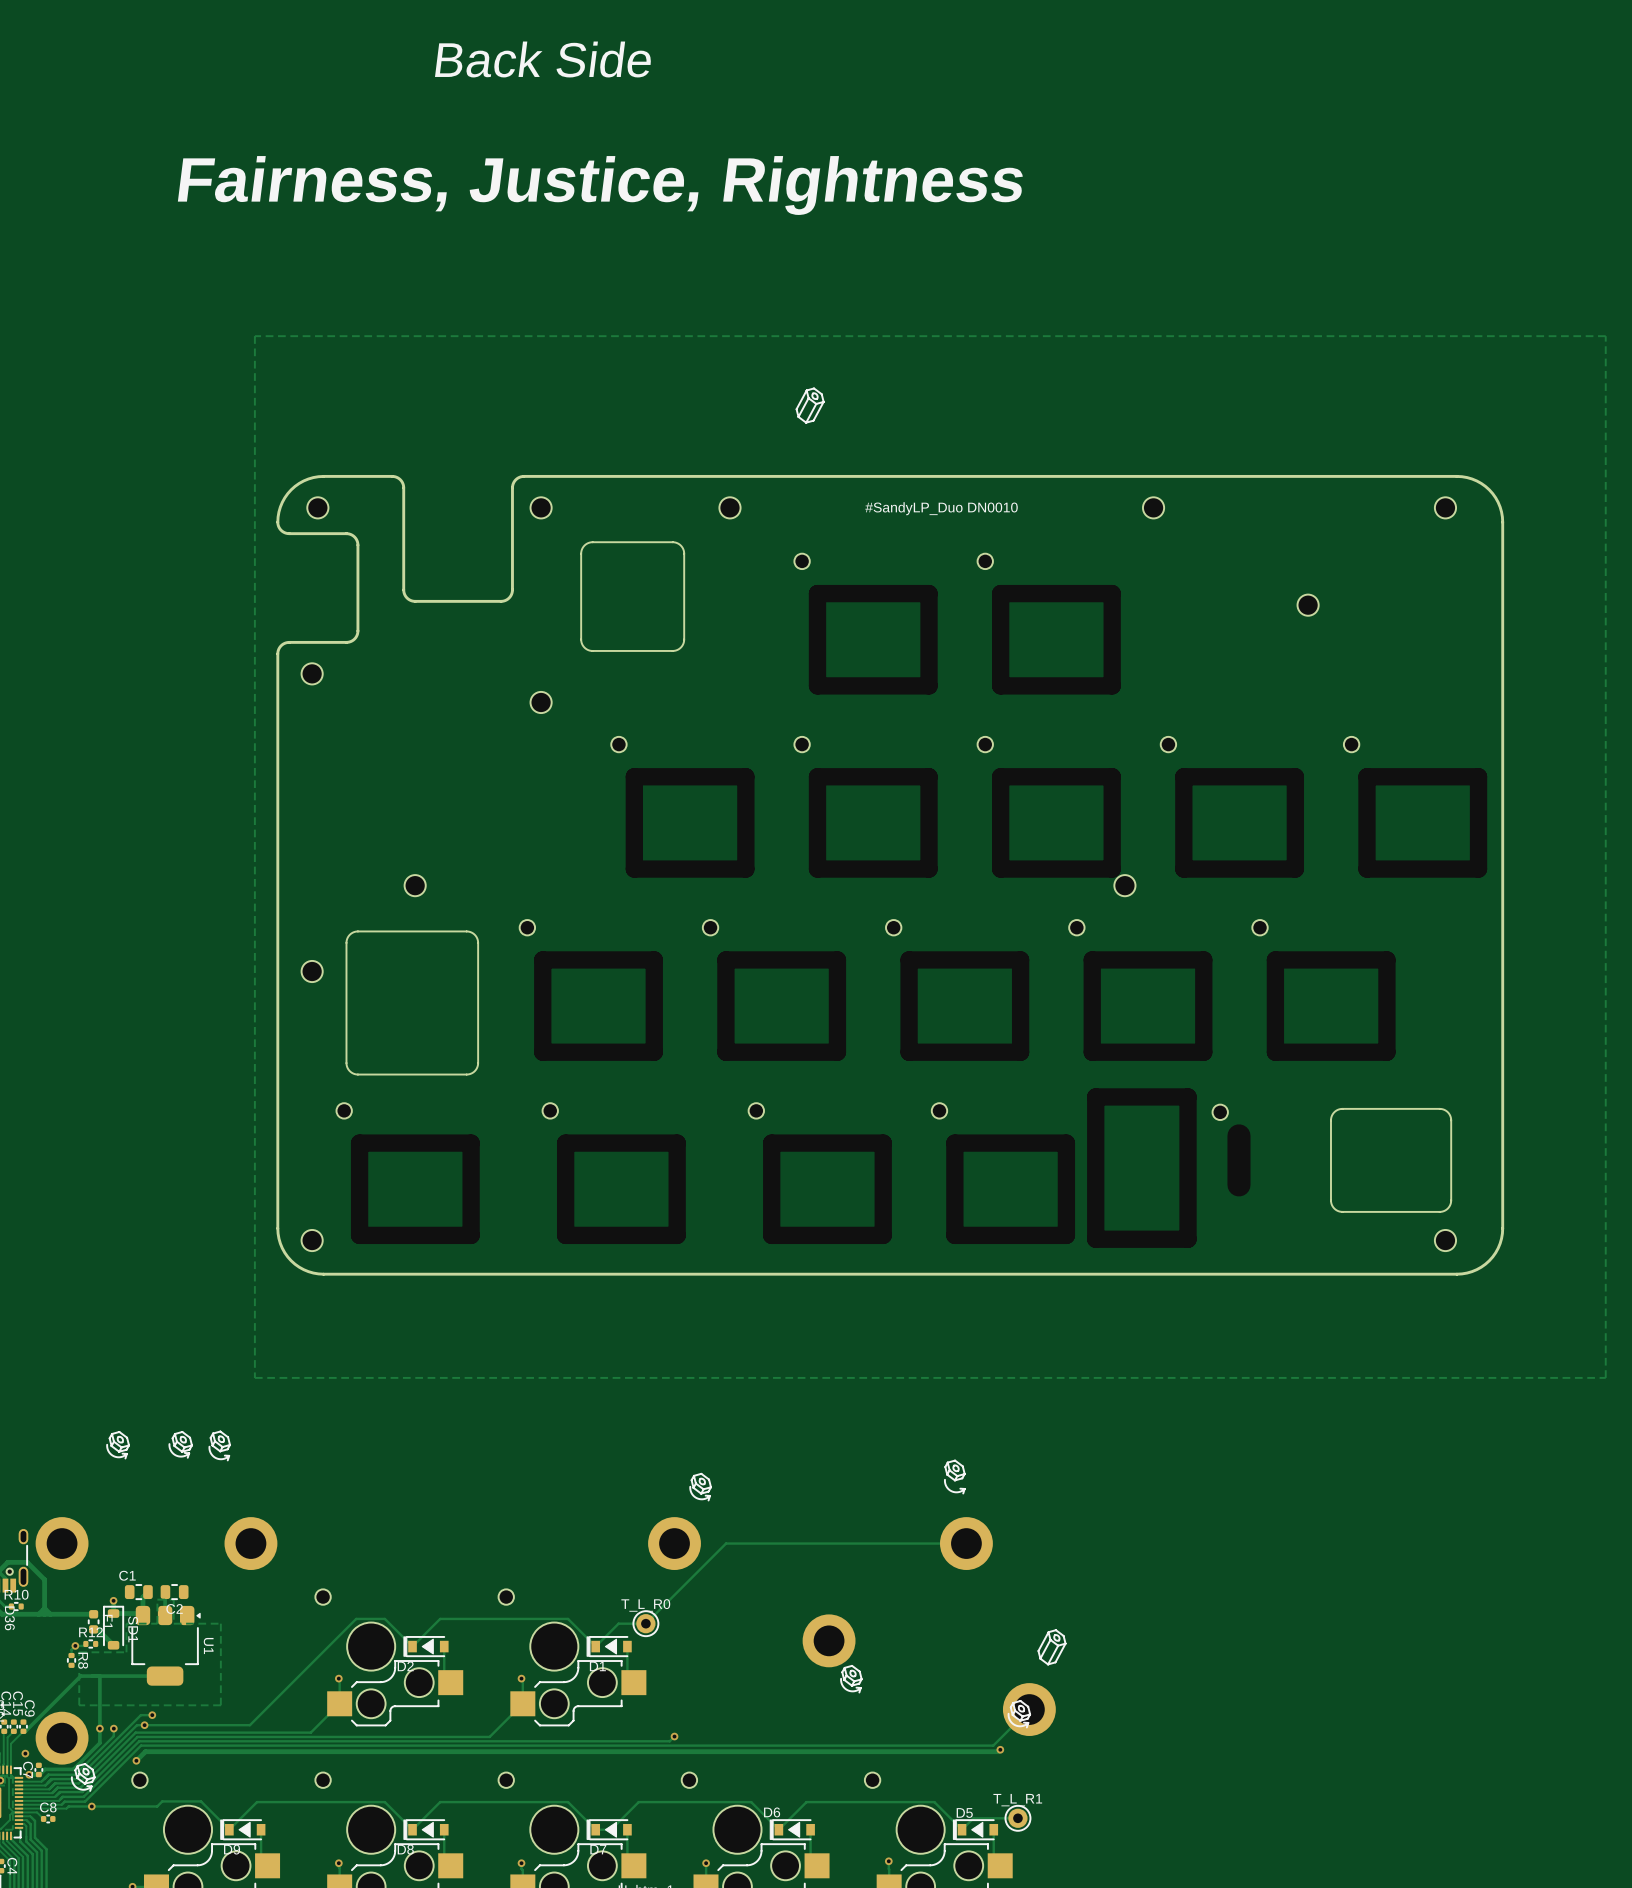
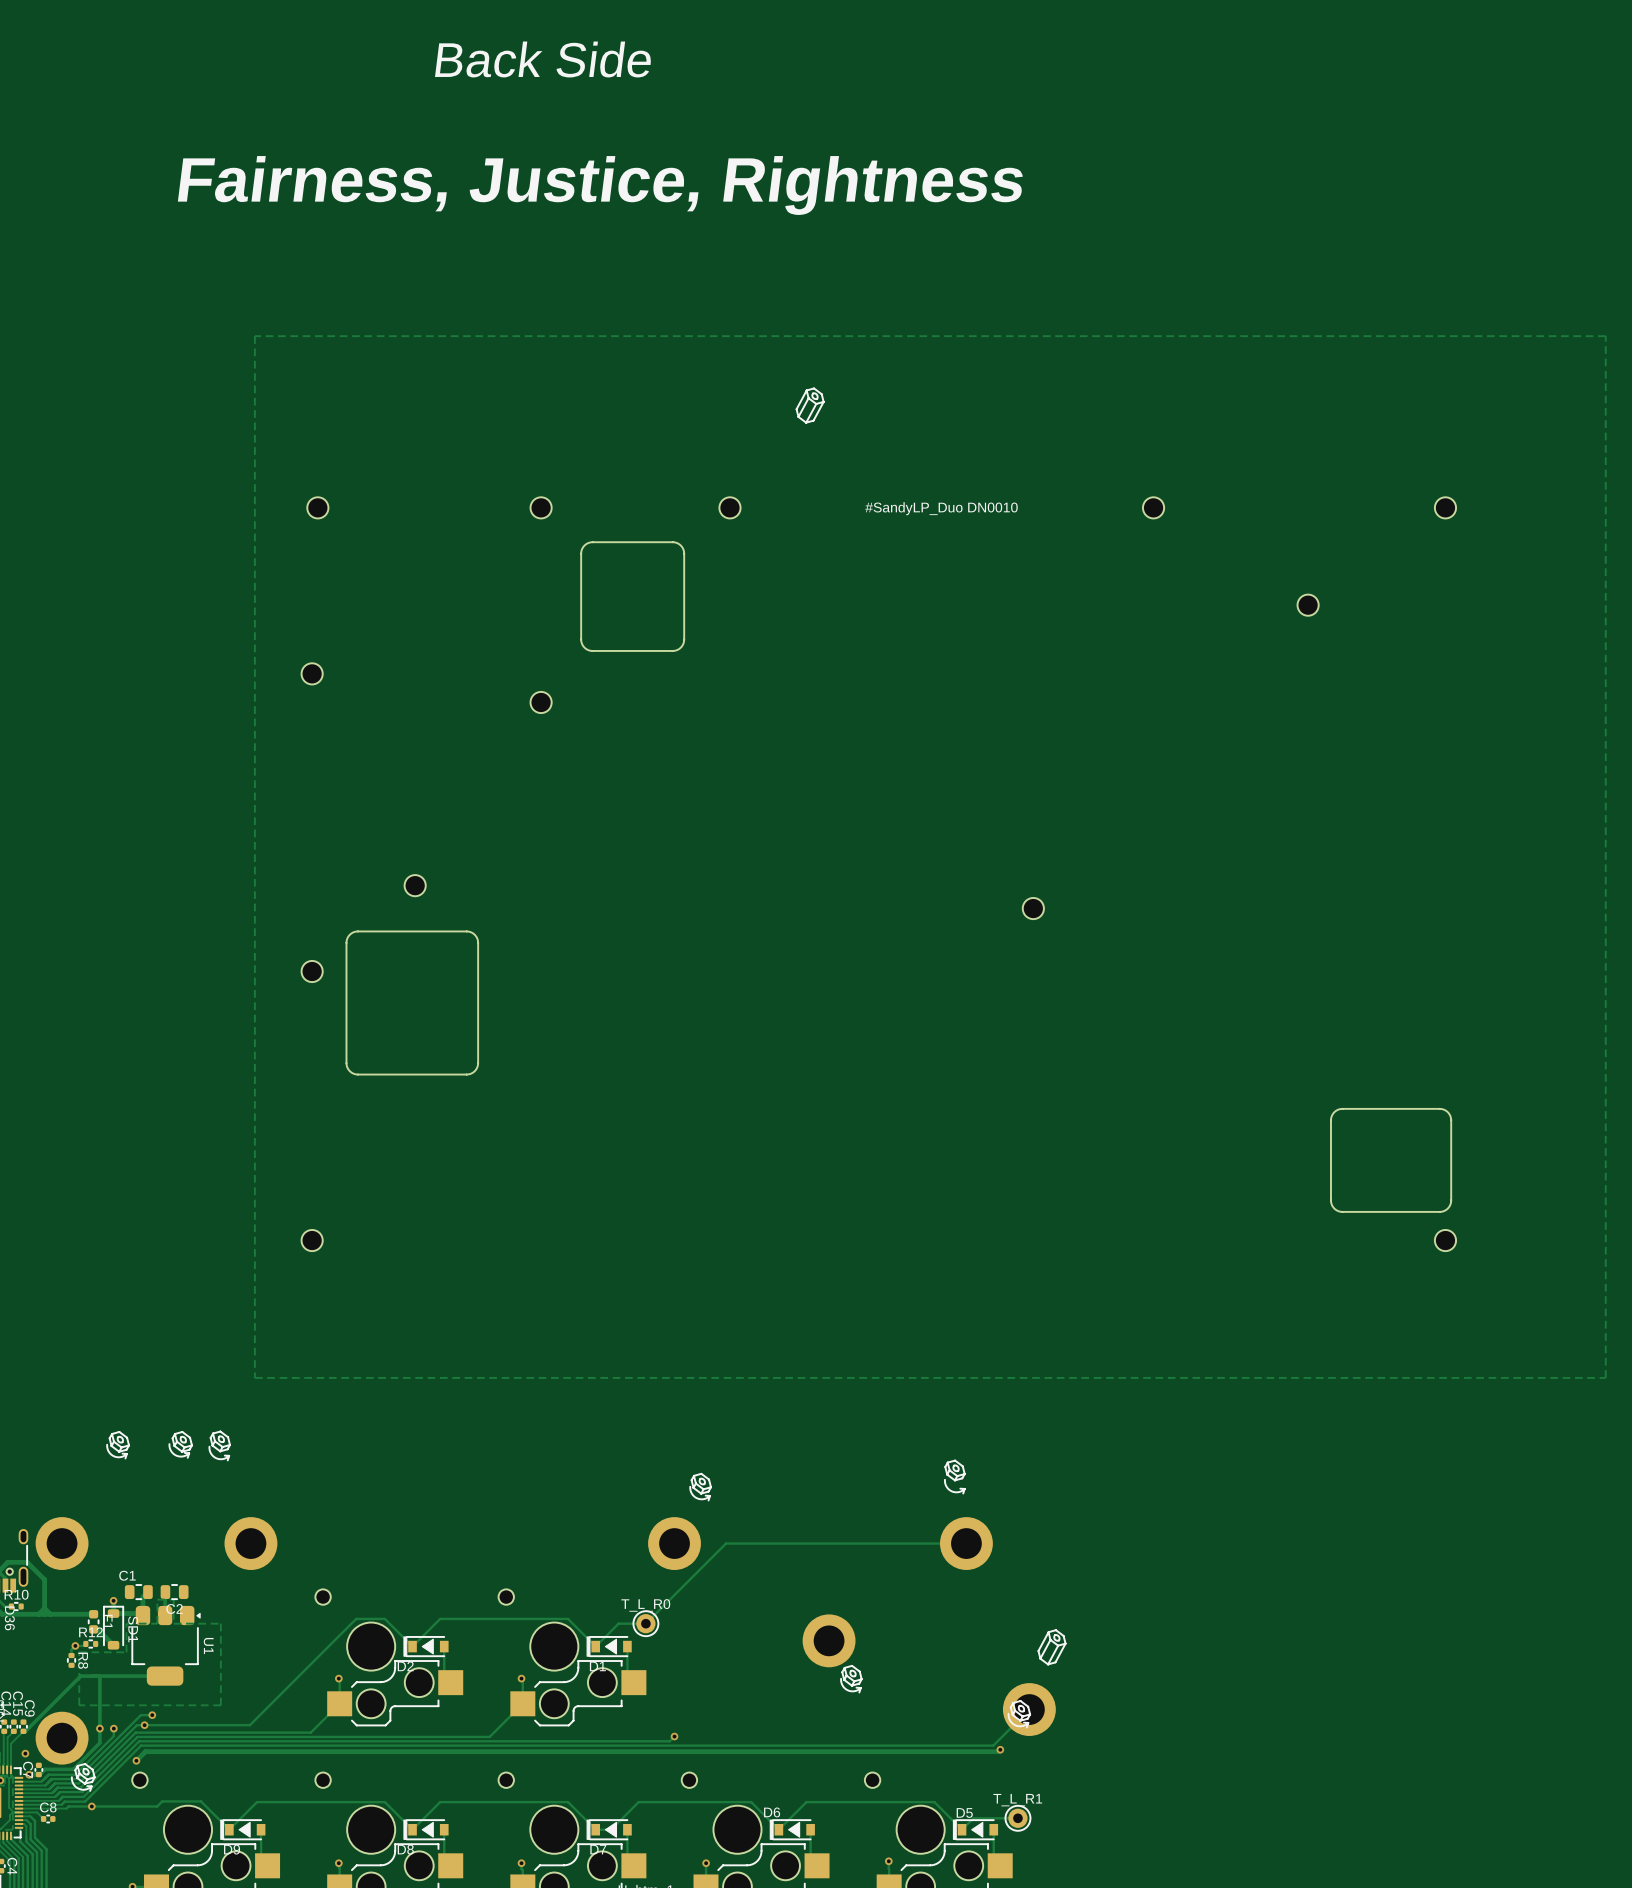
drawing: [276, 474, 1505, 1276] -> none
part: (866, 624) -> none
part: (1049, 624) -> none
part: (682, 807) -> none
part: (866, 807) -> none
part: (1049, 807) -> none
part: (1232, 807) -> none
part: (1415, 807) -> none
part position: (1124, 885) -> (1033, 908)
part: (591, 990) -> none
part: (774, 990) -> none
part: (957, 990) -> none
part: (1140, 990) -> none
part: (1323, 990) -> none
part: (1168, 1168) -> none
part: (408, 1173) -> none
part: (614, 1173) -> none
part: (820, 1173) -> none
part: (1003, 1173) -> none

